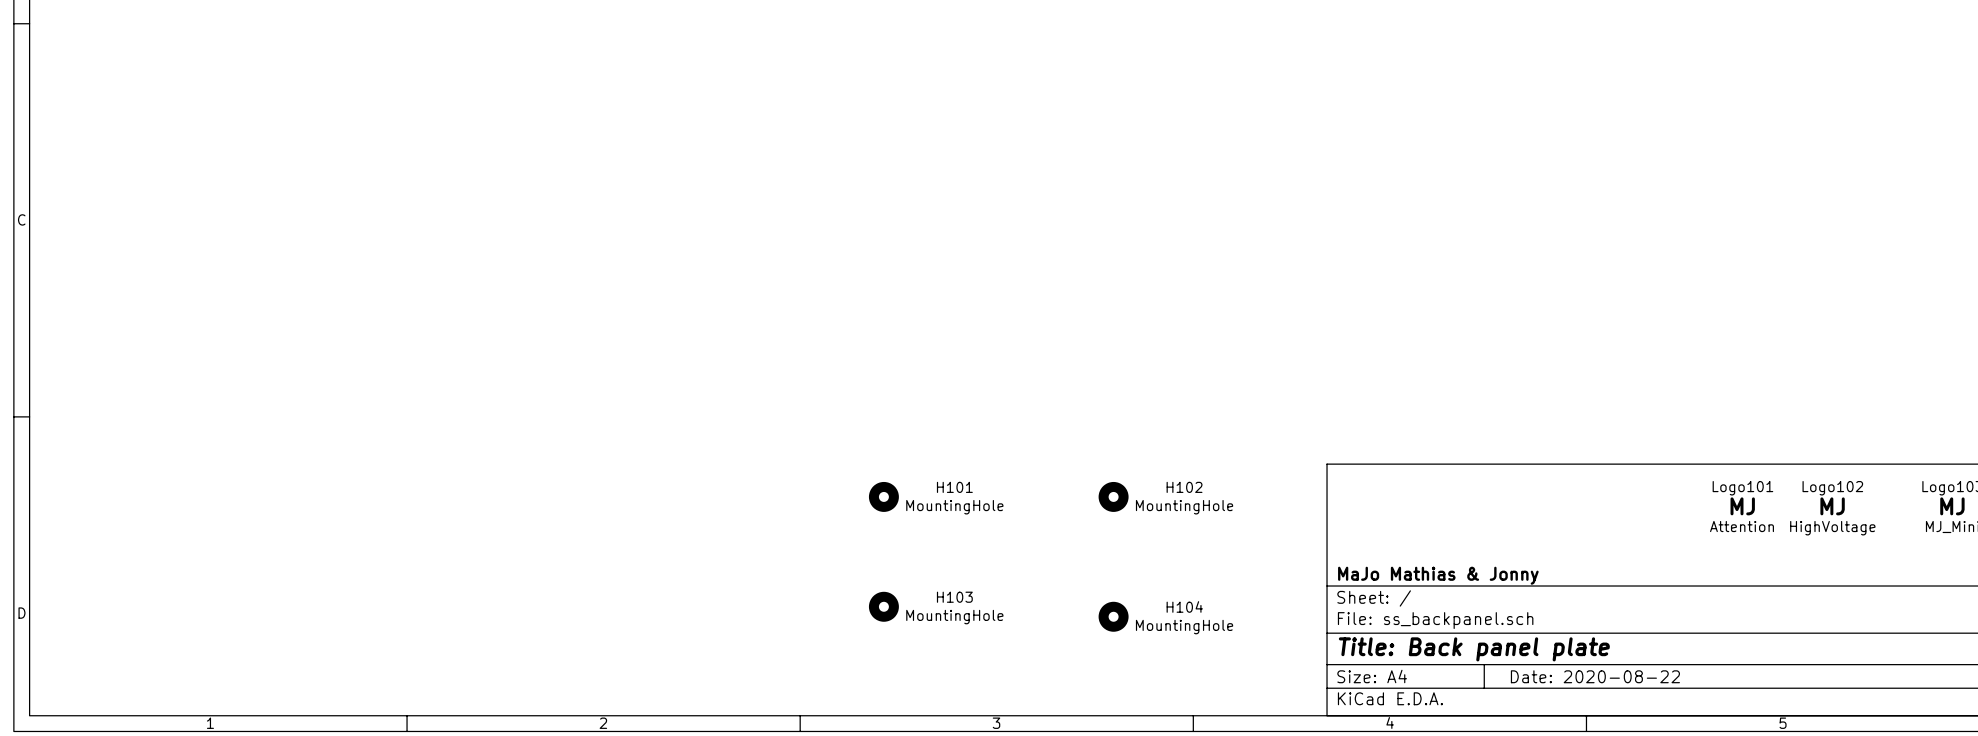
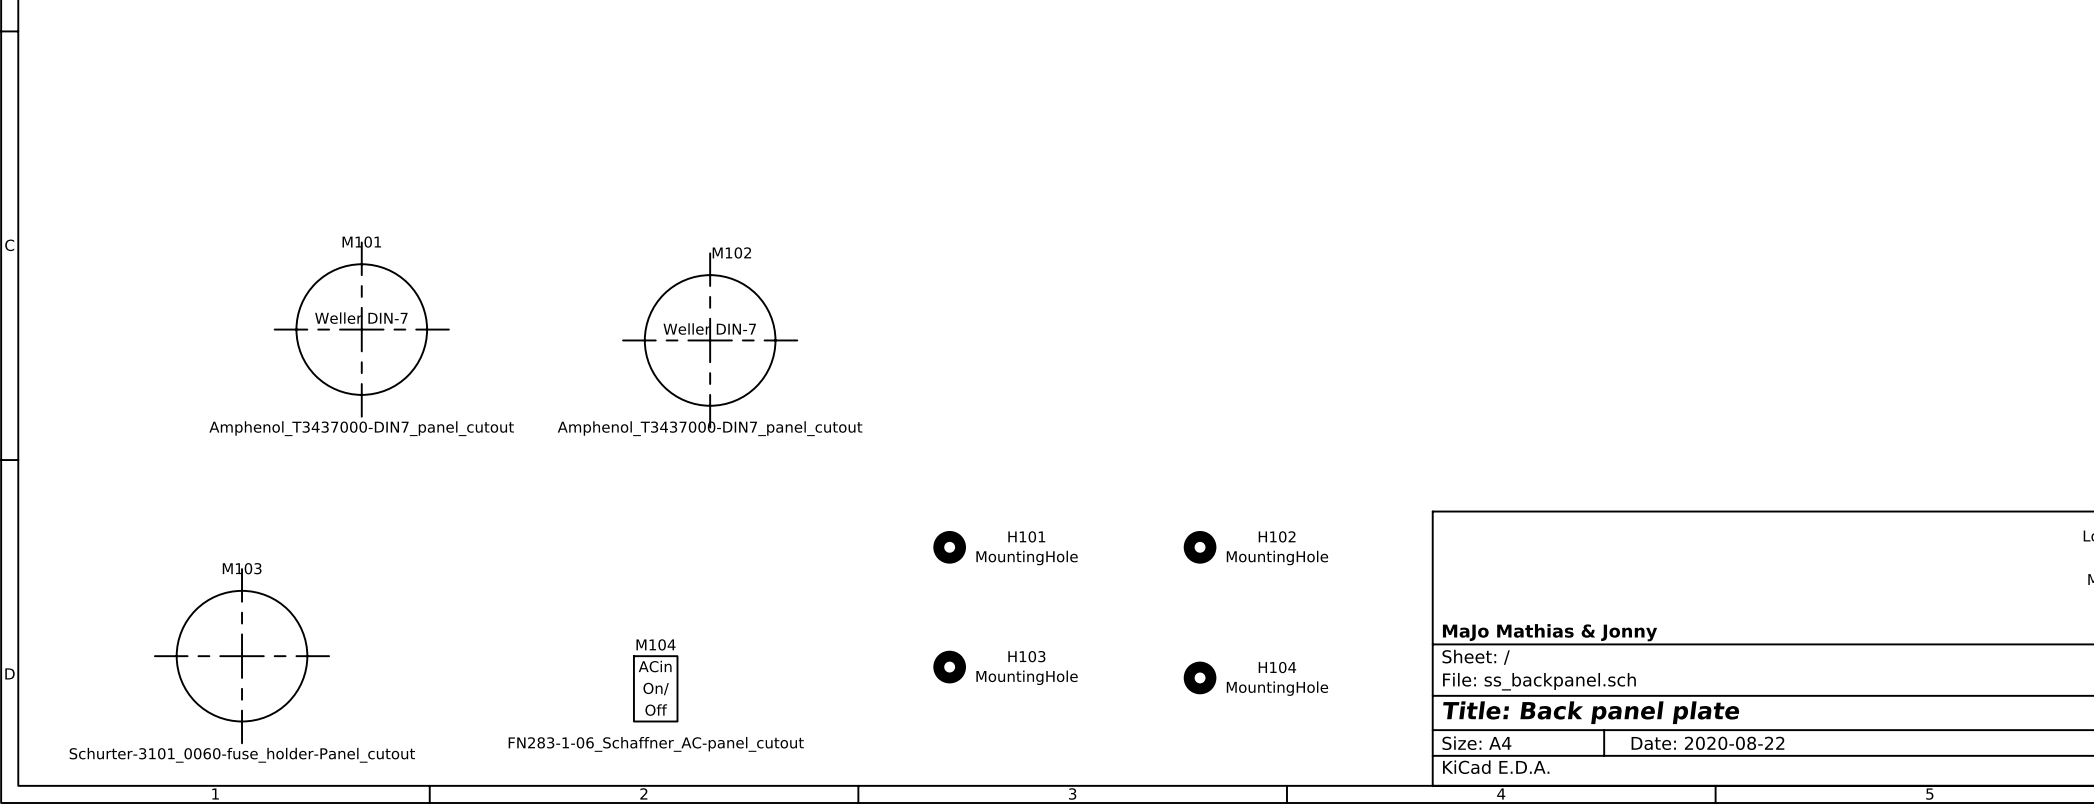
M101: none -> Amphenol_T3437000-DIN7_panel_cutout (361, 329)
M102: none -> Amphenol_T3437000-DIN7_panel_cutout (710, 340)
Logo101: Attention (1741, 506) -> none
Logo102: HighVoltage (1832, 508) -> none
M103: none -> Schurter-3101_0060-fuse_holder-Panel_cutout (242, 656)
M104: none -> FN283-1-06_Schaffner_AC-panel_cutout (655, 688)

